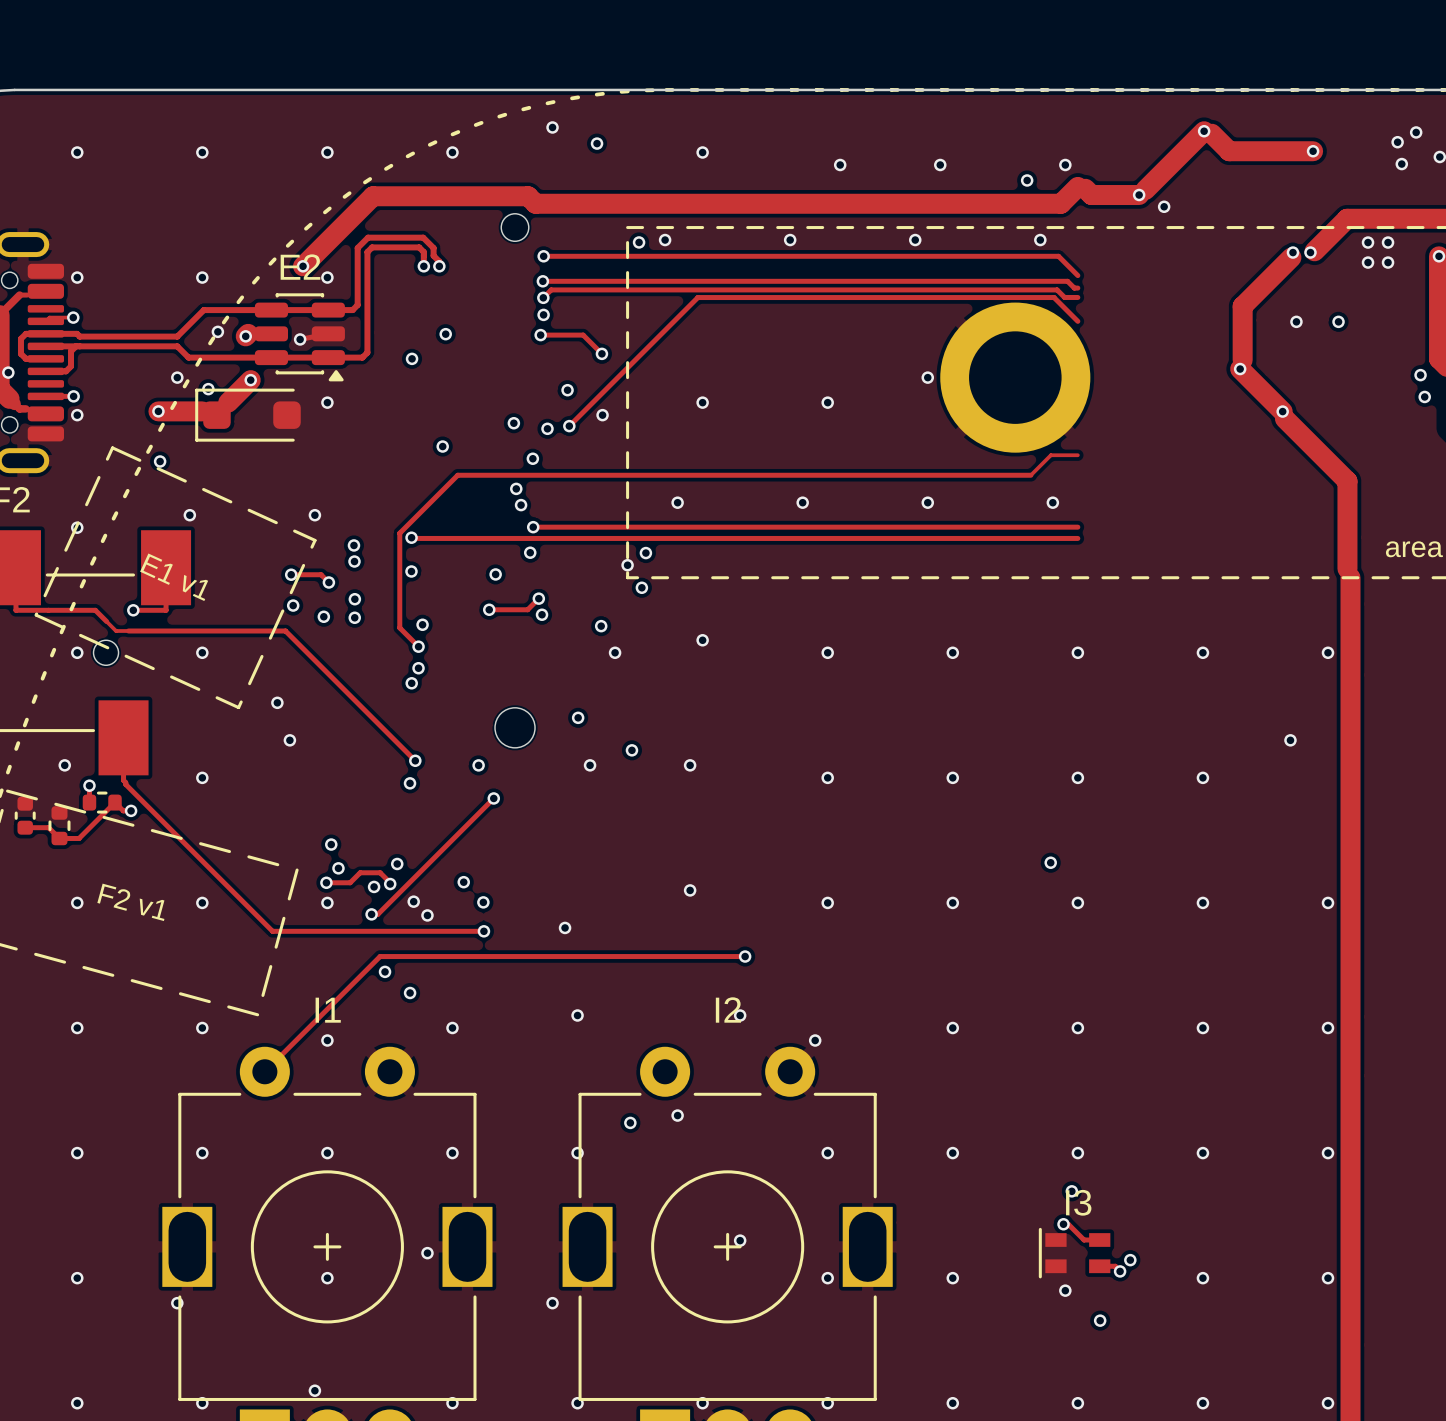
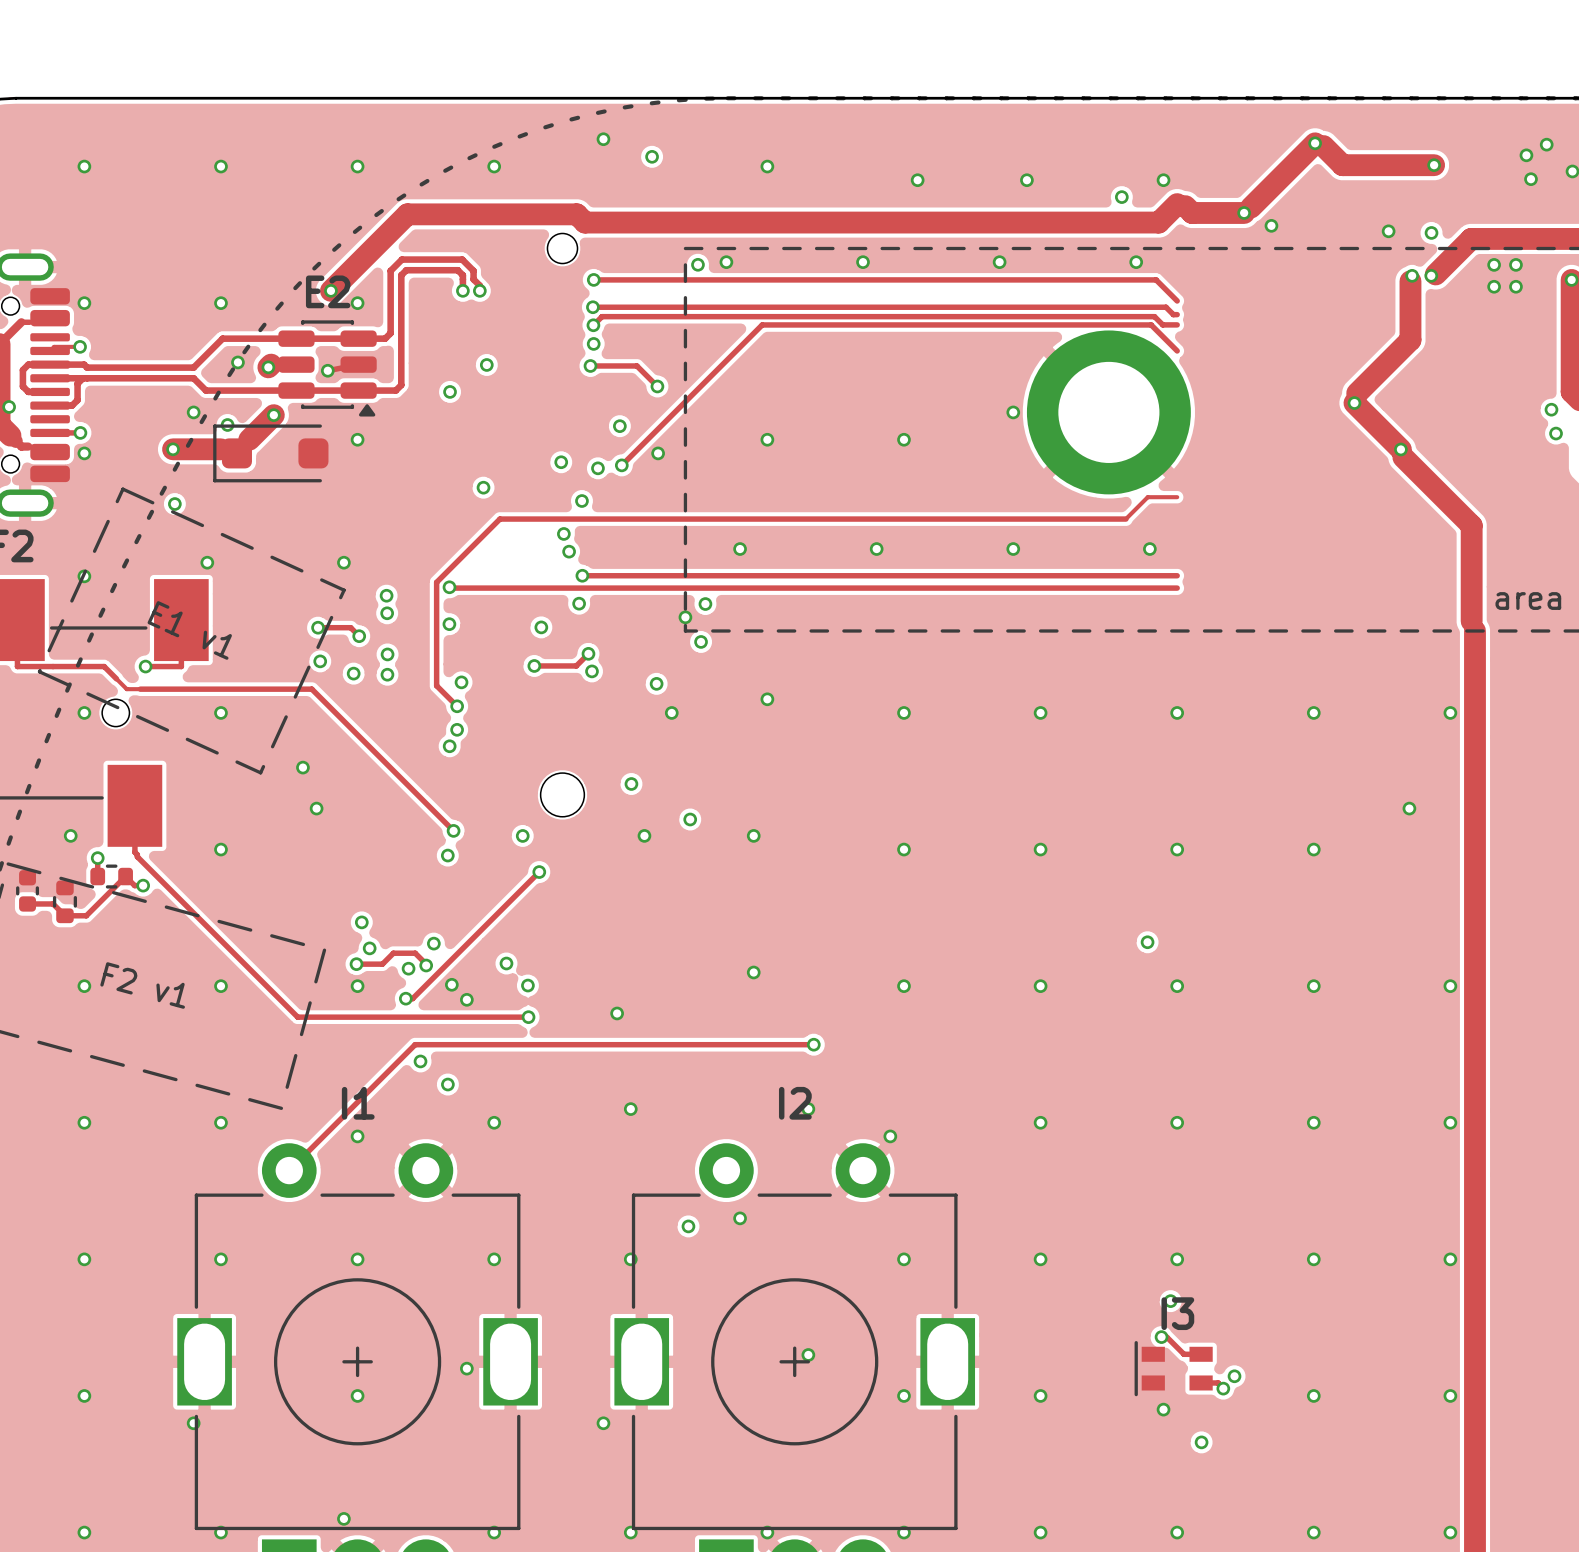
via: none -> (1388, 231)
via: none -> (1431, 232)
track: (1291, 257) (1242, 306) (1242, 360) -> (1410, 281) (1410, 340) (1357, 393)
via: (1296, 321) -> none
via: (1338, 321) -> none

